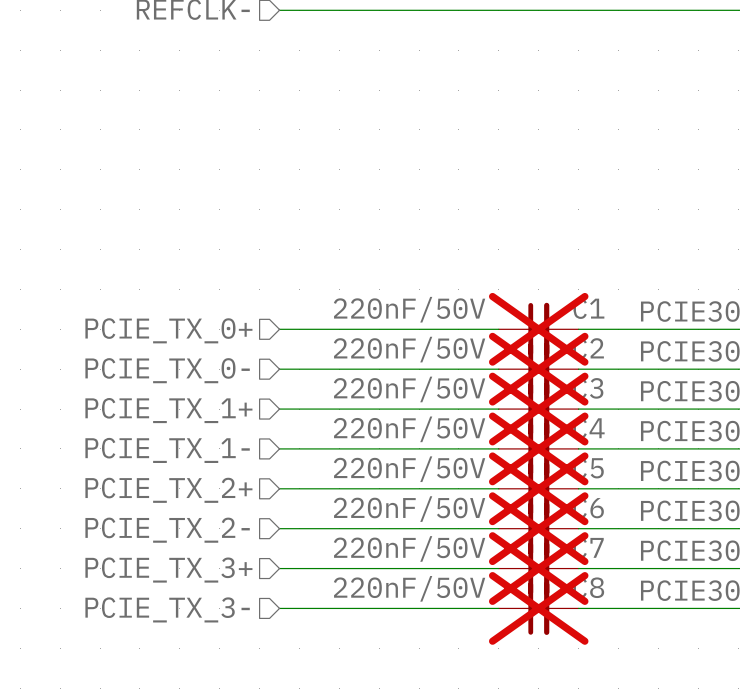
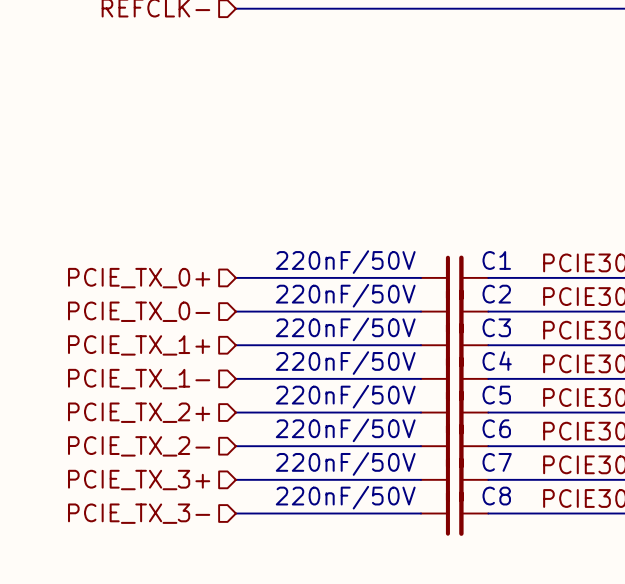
C1 do-not-place cross: (538, 329) -> none
C2 do-not-place cross: (538, 369) -> none
C3 do-not-place cross: (538, 409) -> none
C4 do-not-place cross: (538, 448) -> none
C5 do-not-place cross: (538, 488) -> none
C6 do-not-place cross: (538, 528) -> none
C7 do-not-place cross: (538, 568) -> none
C8 do-not-place cross: (538, 608) -> none

